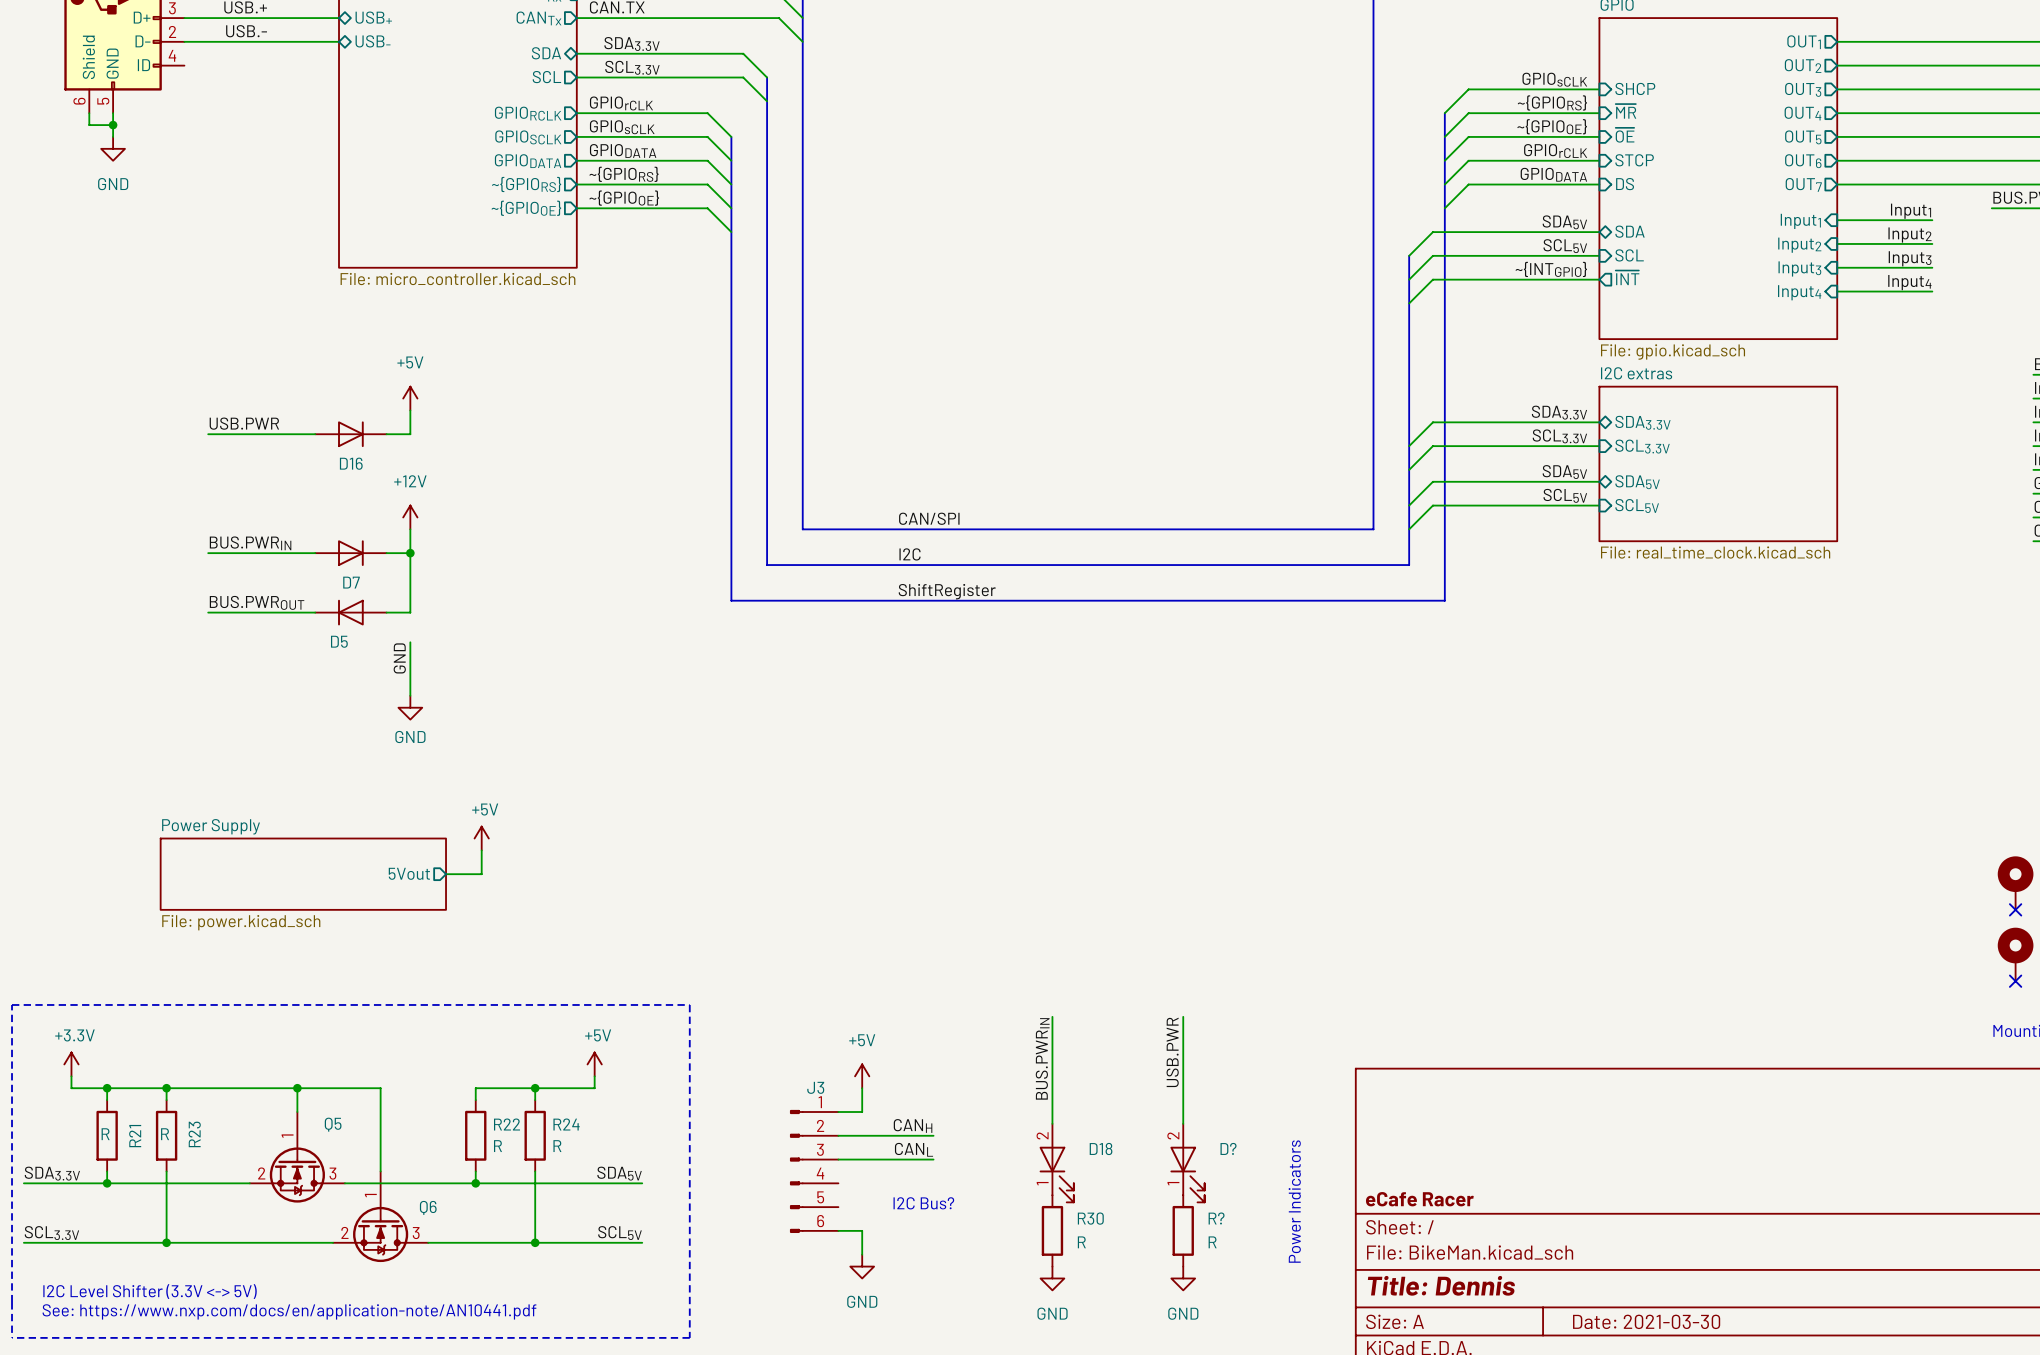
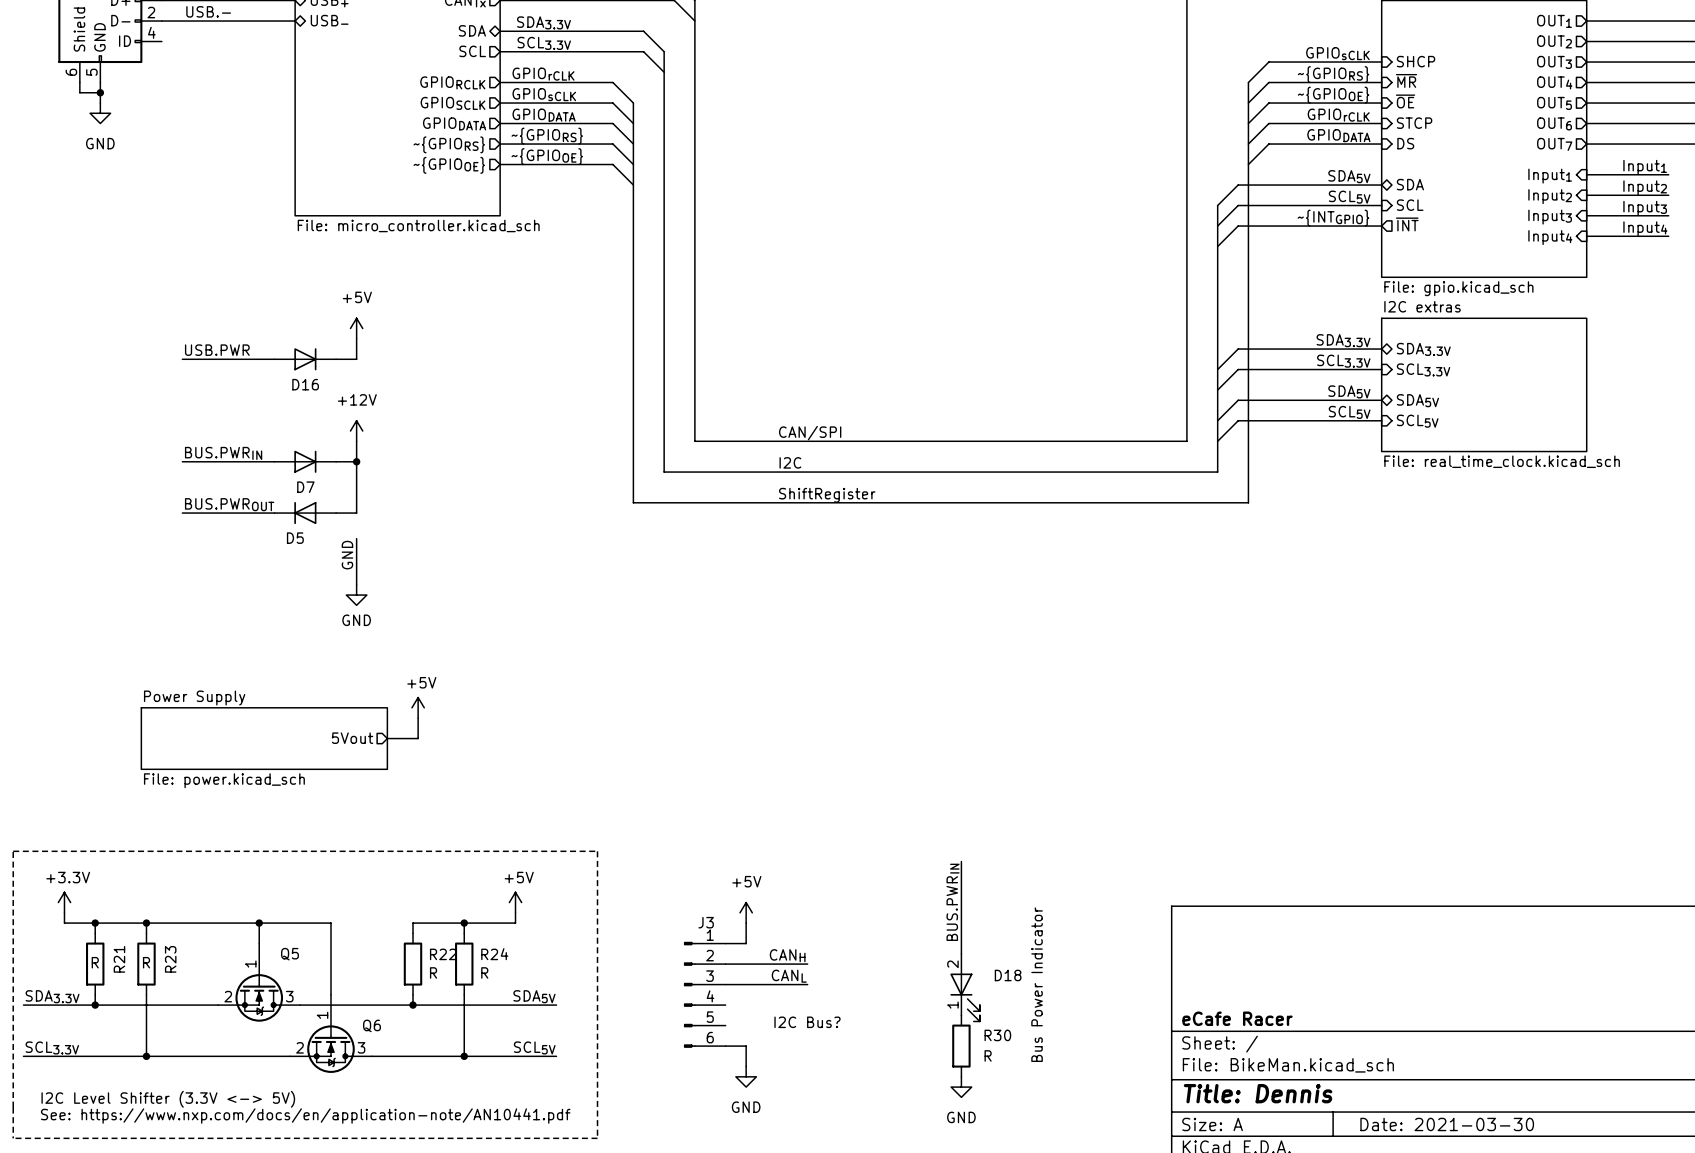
wire: (1052, 1016) (1052, 1123) -> (961, 861) (961, 953)
wire: (1183, 1016) (1183, 1123) -> none
label: USB.PWR (1172, 1052) -> none
label position: BUS.PWRIN (1042, 1058) -> BUS.PWRIN (953, 902)
D18 position: (1056, 1163) -> (965, 987)
D?: (1187, 1163) -> none
text: none -> Bus Power Indicator (1037, 984)
text: Power Indicators (1294, 1201) -> none
R30 position: (1052, 1230) -> (961, 1046)
R?: R (1183, 1230) -> none
power symbol: GND (1052, 1278) -> none
power symbol: none -> GND (961, 1087)
power symbol: GND (1183, 1278) -> none

